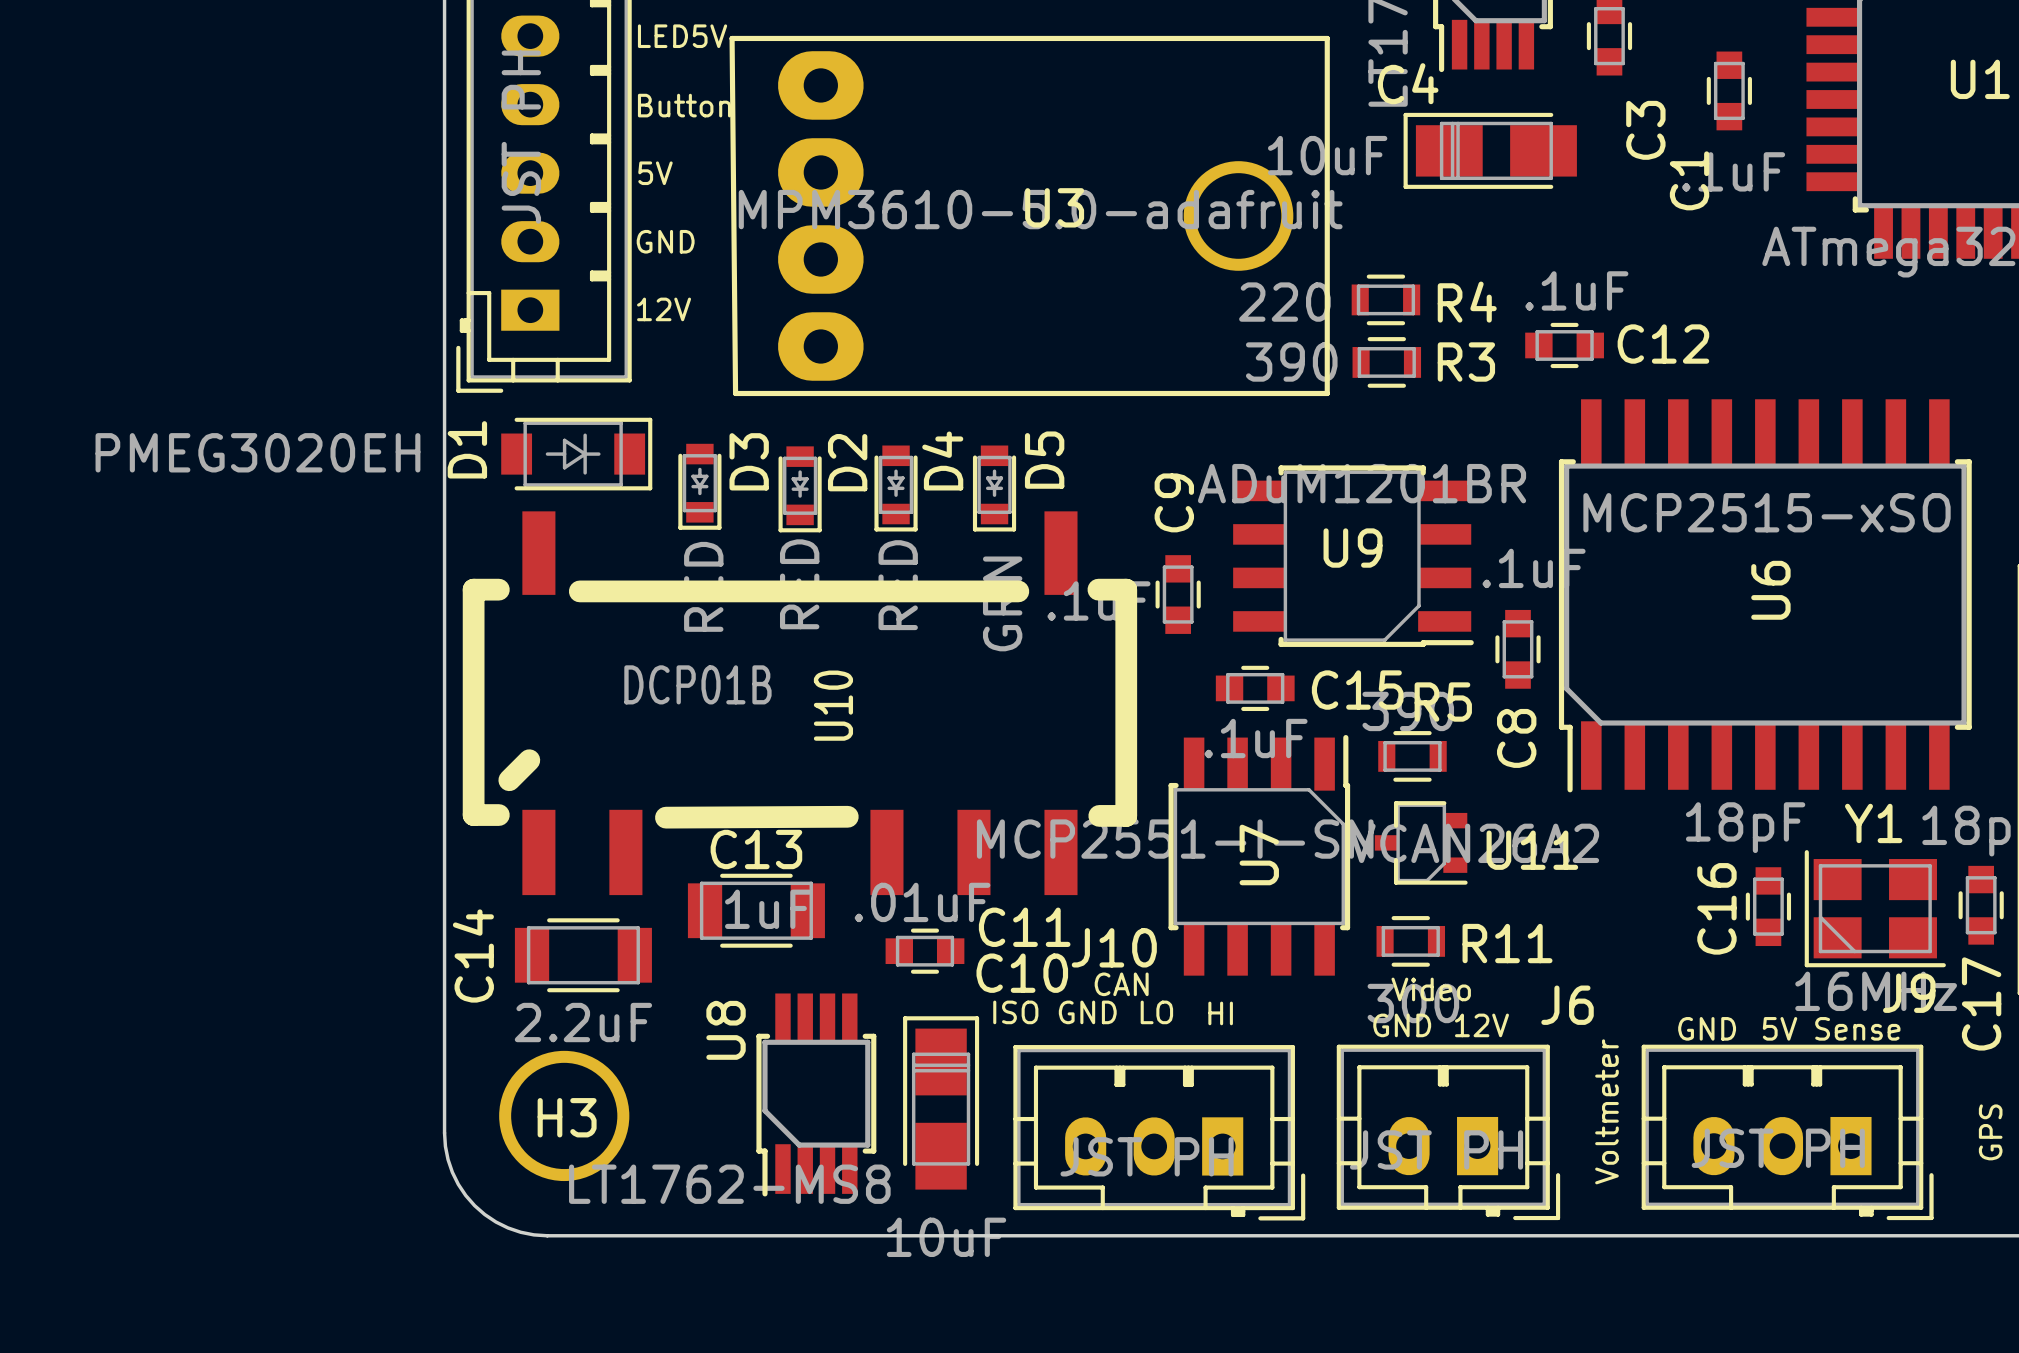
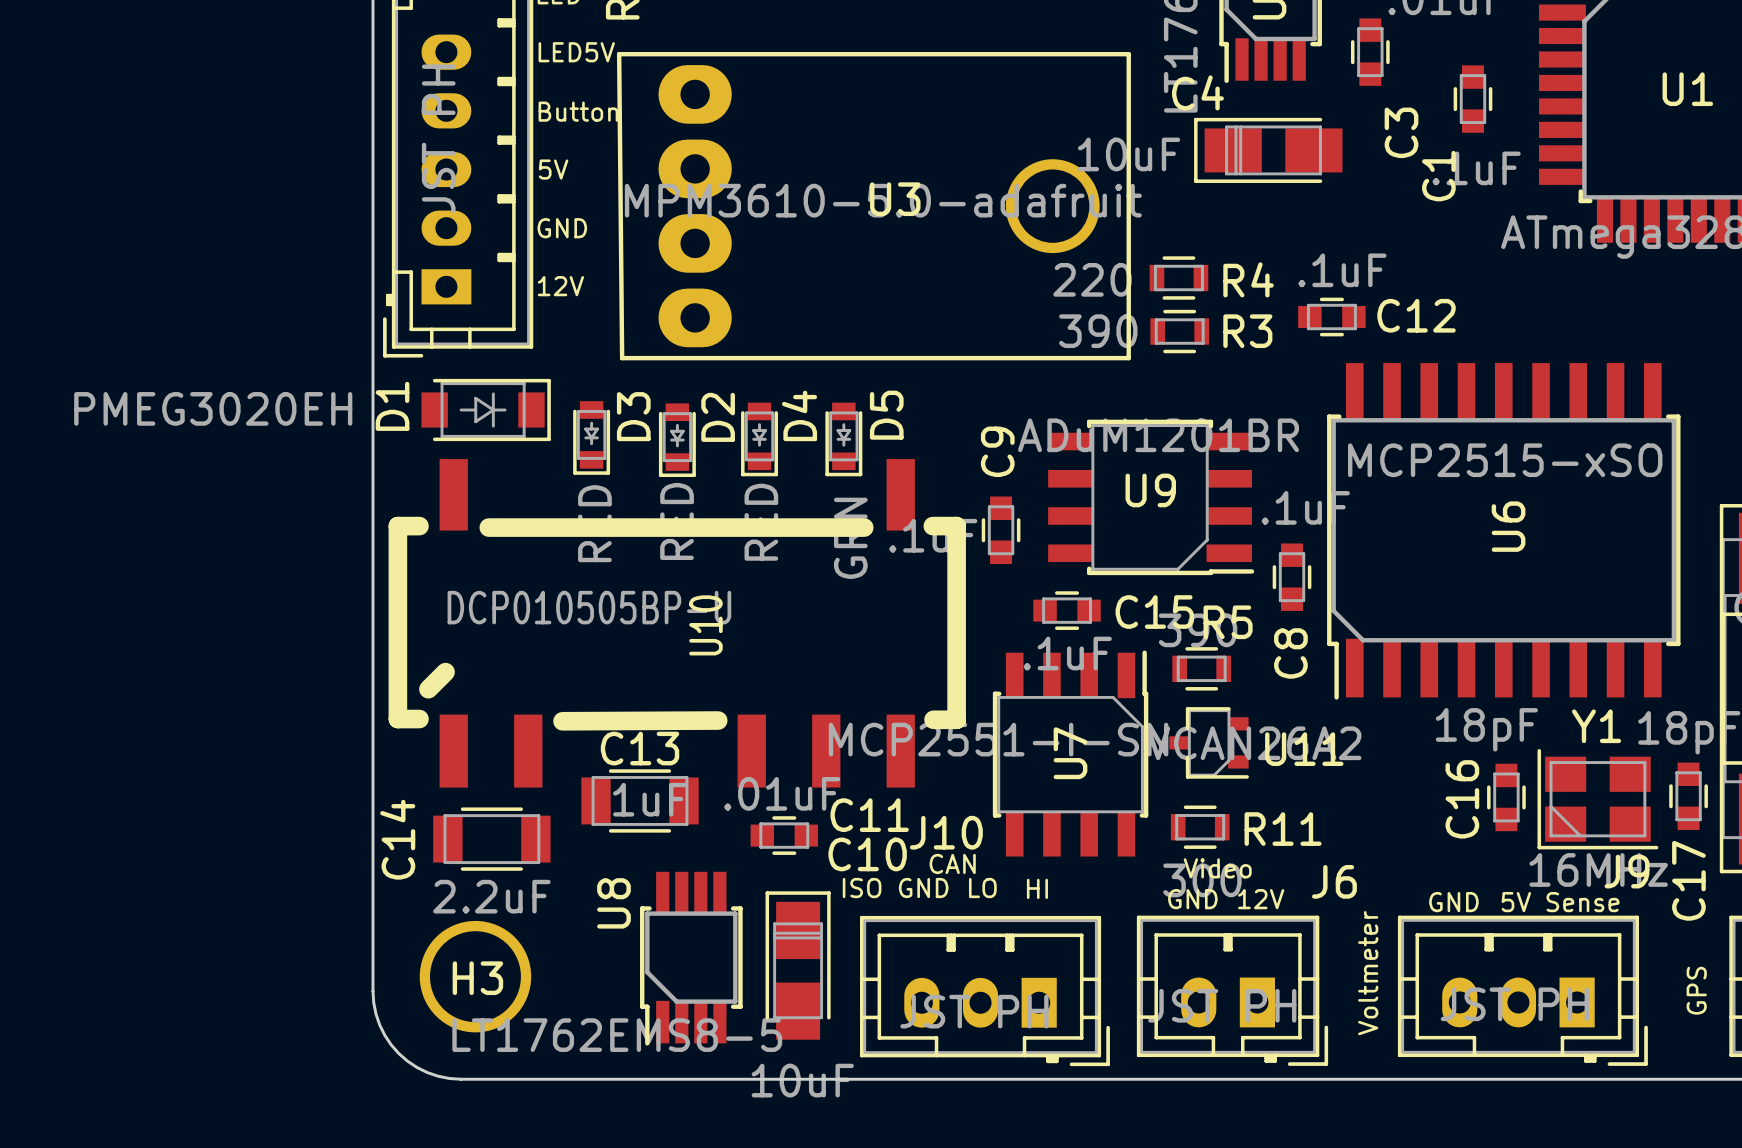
U10 value: DCP01B (697, 684) -> DCP010505BP-U (589, 607)
U8 value: LT1762-MS8 (729, 1184) -> LT1762EMS8-5 (617, 1035)

